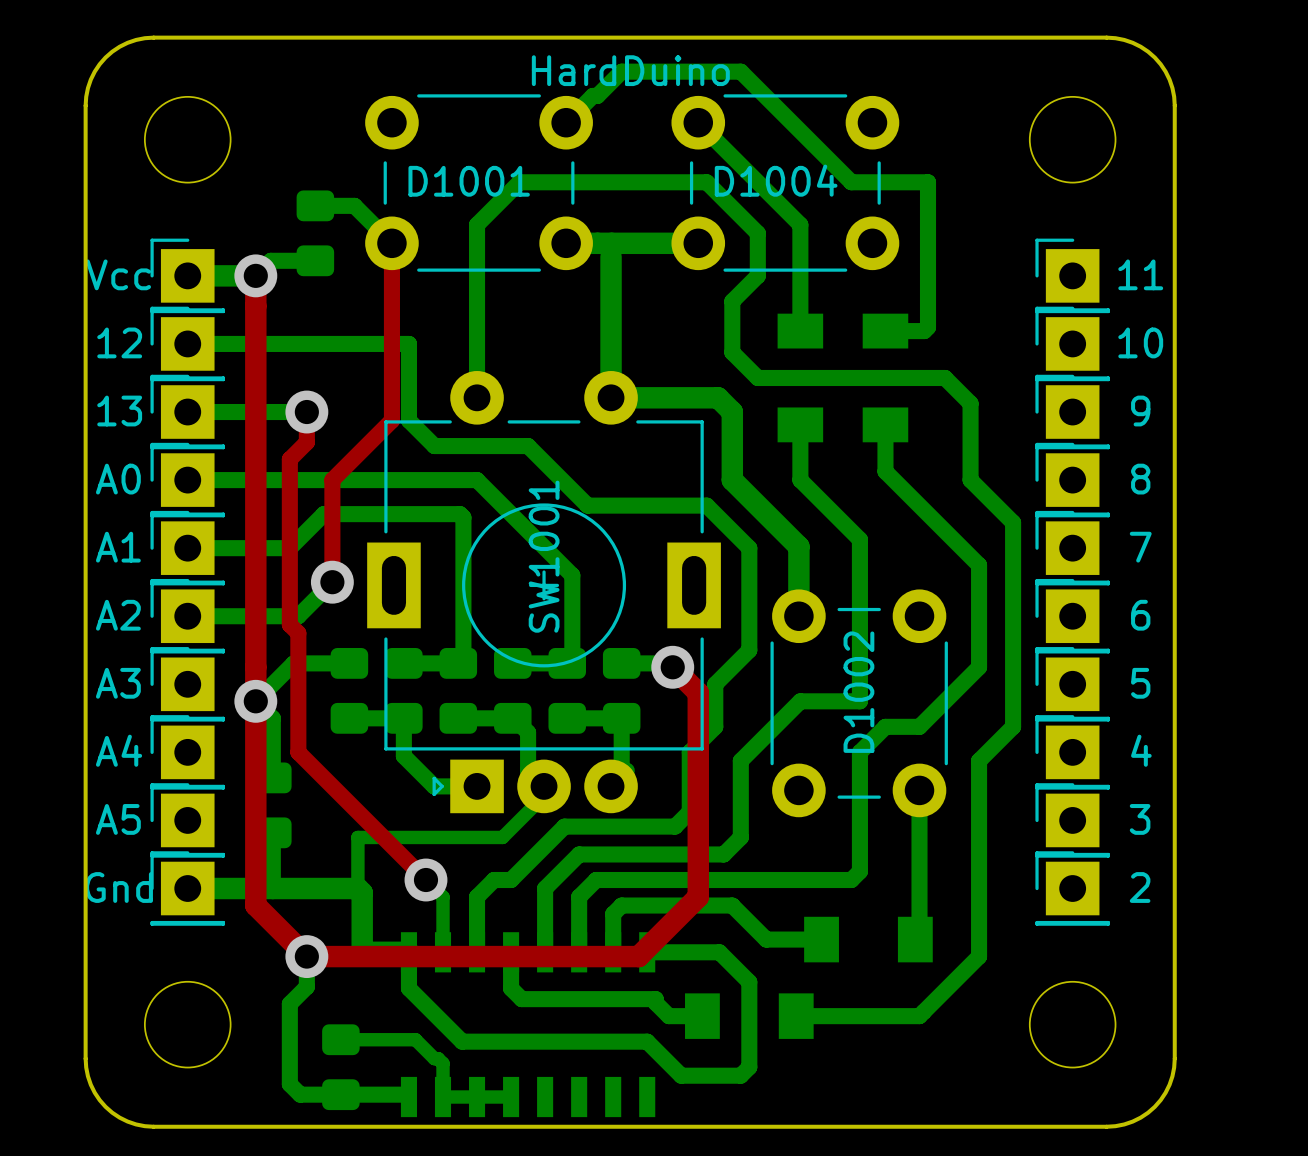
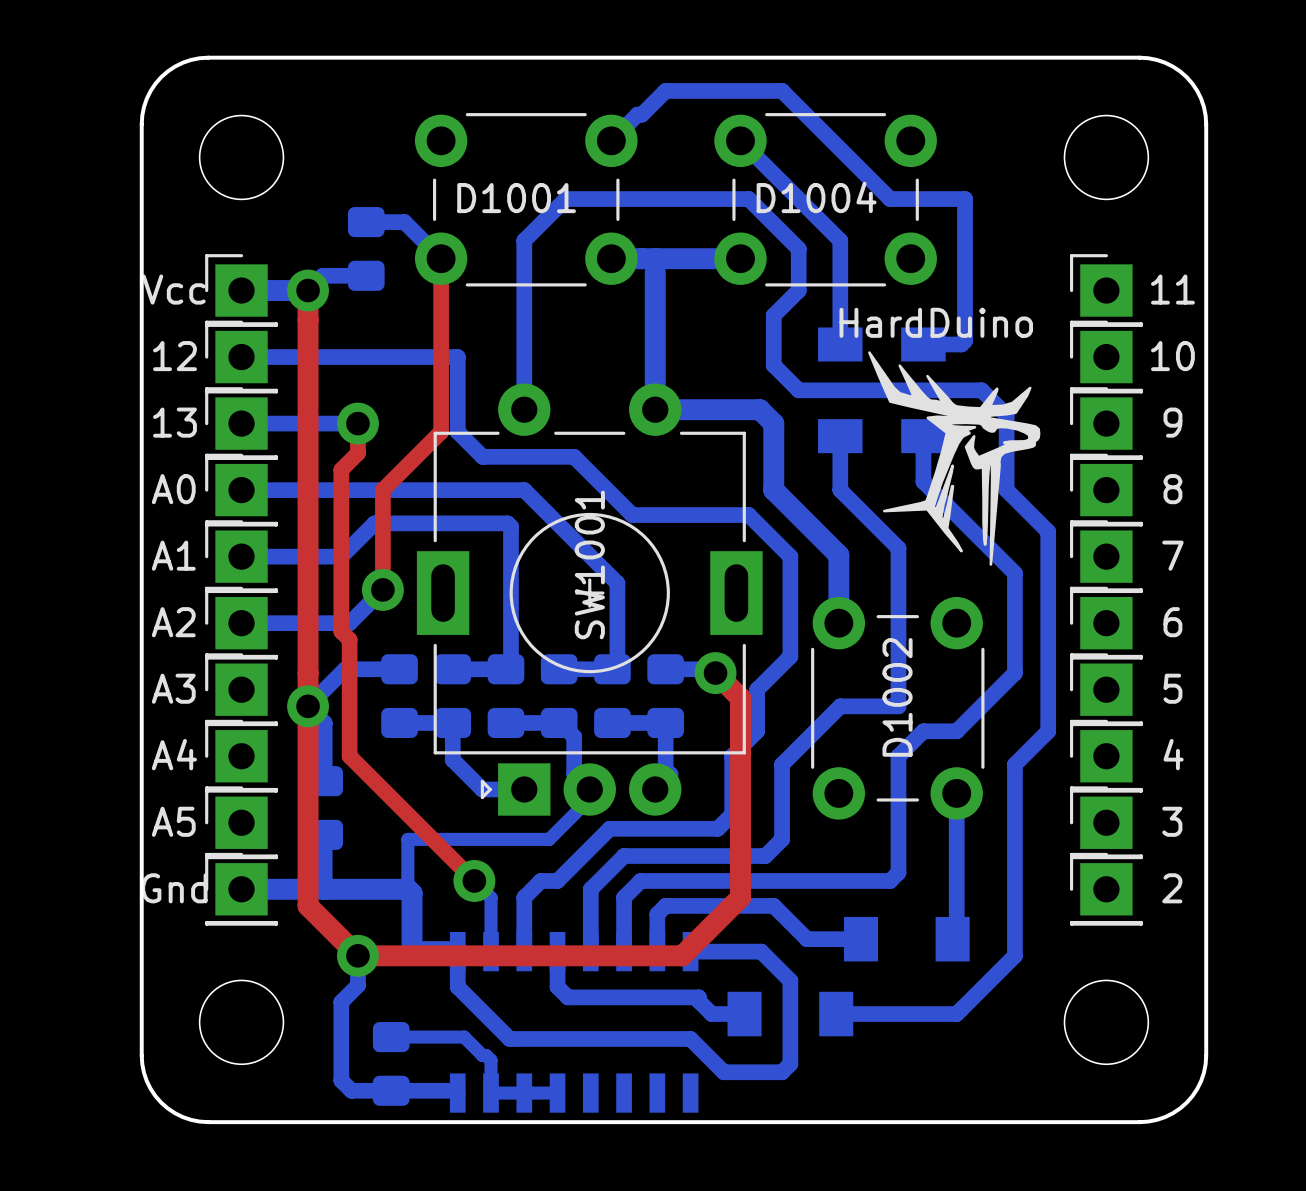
text position: HardDuino (630, 70) -> HardDuino (936, 322)
drawing: none -> [868, 351, 1041, 566]

